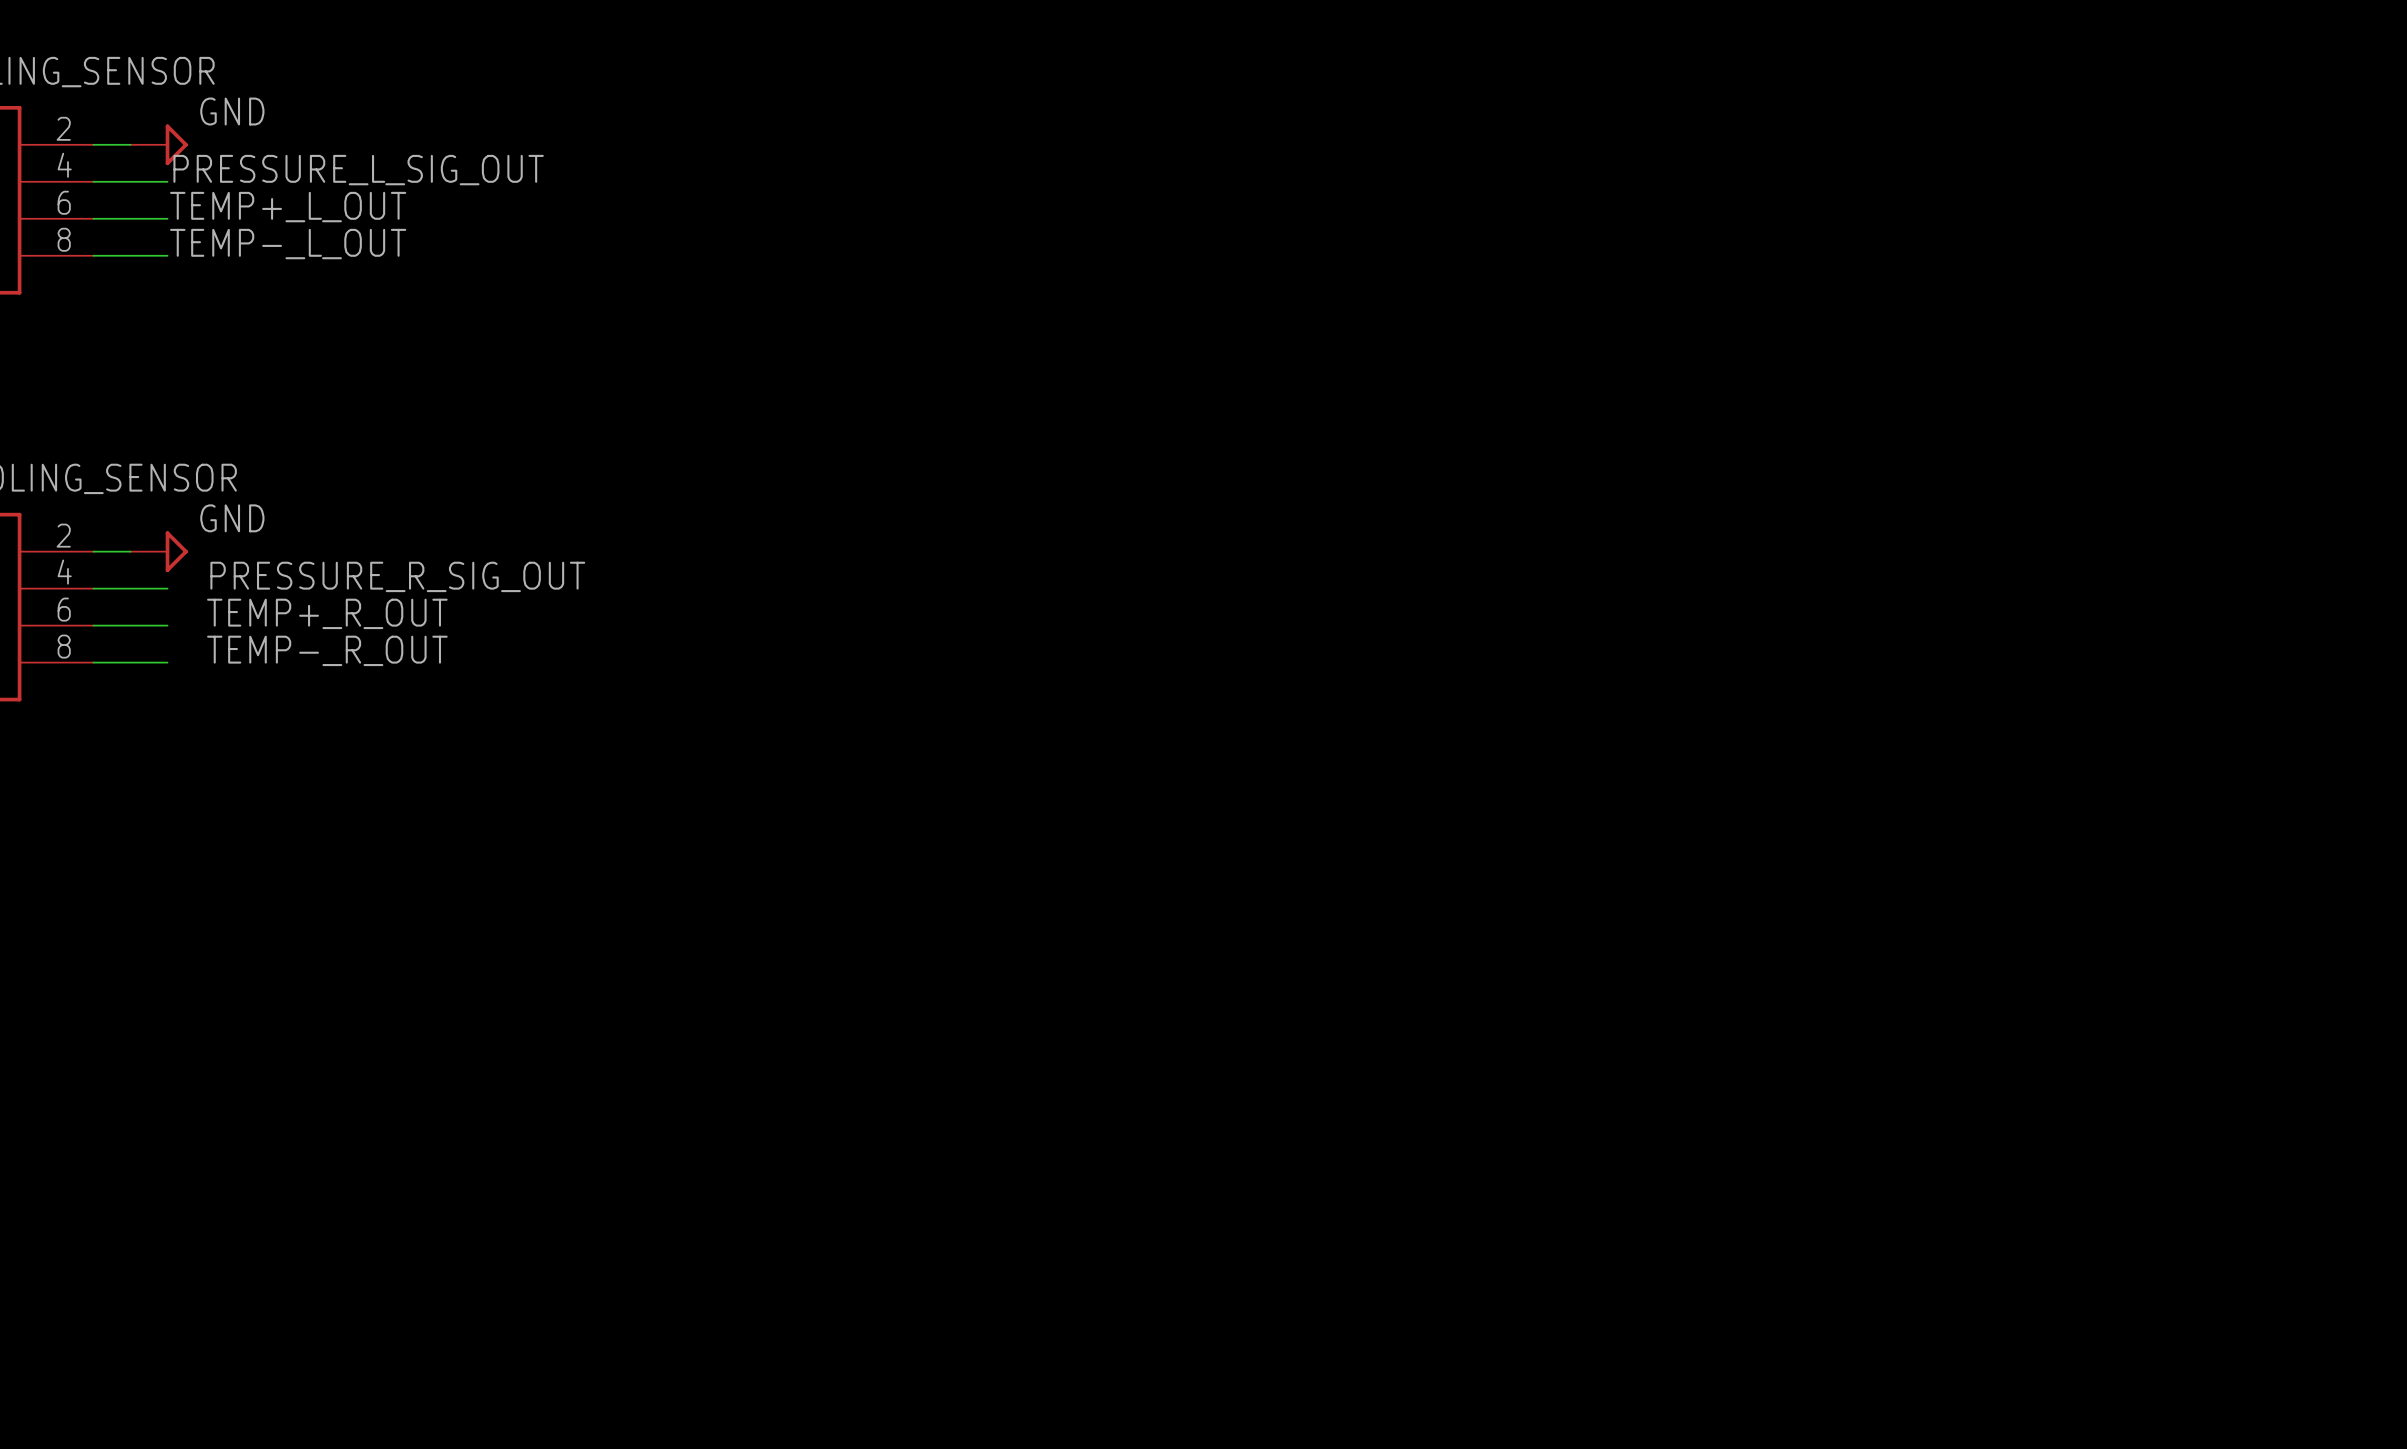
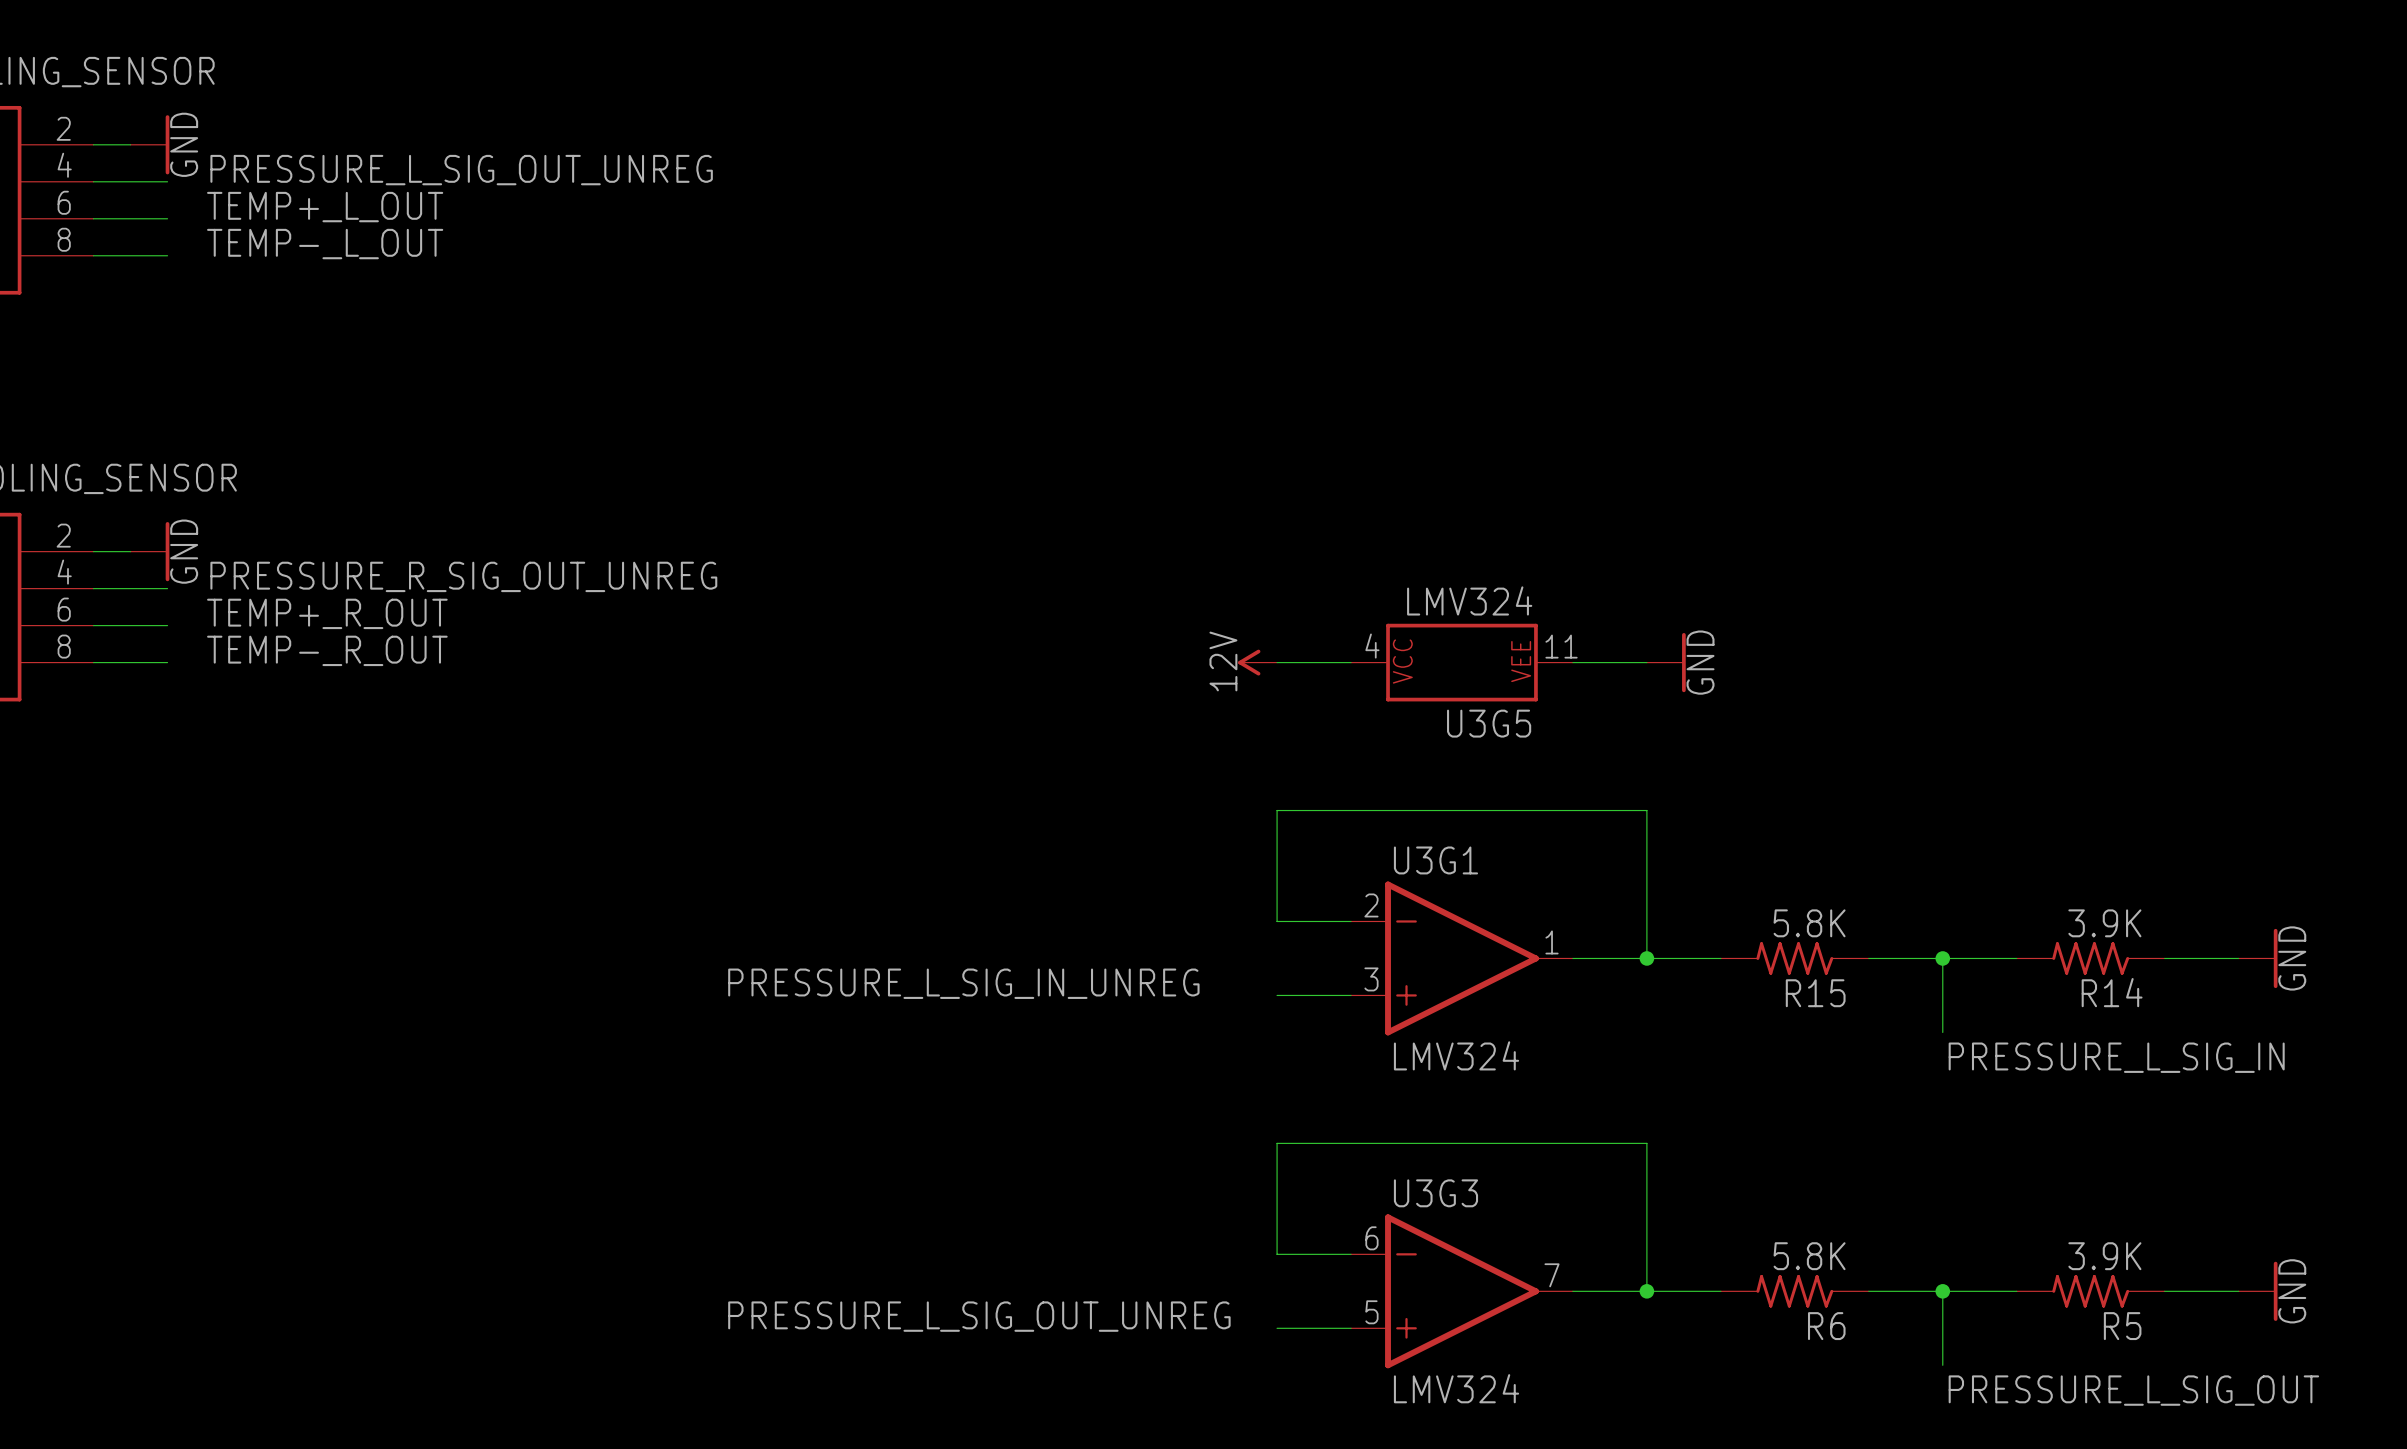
power symbol text position: GND (232, 111) -> GND (184, 144)
power symbol shape: [130, 124, 188, 166] -> [130, 115, 170, 175]
label: PRESSURE_L_SIG_OUT (358, 170) -> PRESSURE_L_SIG_OUT_UNREG (461, 170)
label position: TEMP+_L_OUT (288, 207) -> TEMP+_L_OUT (325, 207)
label position: TEMP-_L_OUT (288, 244) -> TEMP-_L_OUT (325, 244)
power symbol text position: GND (232, 518) -> GND (184, 551)
power symbol shape: [130, 531, 188, 572] -> [130, 522, 170, 582]
label: PRESSURE_R_SIG_OUT (397, 576) -> PRESSURE_R_SIG_OUT_UNREG (463, 576)
power symbol: none -> 12V (1257, 662)
wire: none -> (1277, 662) (1351, 662)
U3G5: none -> LMV324 (1461, 662)
wire: none -> (1572, 662) (1646, 662)
power symbol: none -> GND (1666, 662)
wire: none -> (1351, 921) (1277, 921) (1277, 810) (1646, 810) (1646, 958)
U3G1: none -> LMV324 (1461, 958)
wire: none -> (1572, 958) (1720, 958)
junction: none -> (1646, 958)
R15: none -> 5.8K (1794, 958)
wire: none -> (1868, 958) (2016, 958)
wire: none -> (1942, 958) (1942, 1032)
junction: none -> (1942, 958)
R14: none -> 3.9K (2090, 958)
wire: none -> (2164, 958) (2238, 958)
power symbol: none -> GND (2258, 958)
label: none -> PRESSURE_L_SIG_IN_UNREG (963, 983)
wire: none -> (1277, 995) (1351, 995)
label: none -> PRESSURE_L_SIG_IN (2116, 1057)
wire: none -> (1351, 1254) (1277, 1254) (1277, 1143) (1646, 1143) (1646, 1291)
U3G3: none -> LMV324 (1461, 1291)
wire: none -> (1572, 1291) (1720, 1291)
junction: none -> (1646, 1291)
R6: none -> 5.8K (1794, 1291)
wire: none -> (1868, 1291) (2016, 1291)
wire: none -> (1942, 1291) (1942, 1365)
junction: none -> (1942, 1291)
R5: none -> 3.9K (2090, 1291)
wire: none -> (2164, 1291) (2238, 1291)
power symbol: none -> GND (2258, 1291)
label: none -> PRESSURE_L_SIG_OUT_UNREG (979, 1316)
wire: none -> (1277, 1328) (1351, 1328)
label: none -> PRESSURE_L_SIG_OUT (2133, 1390)

